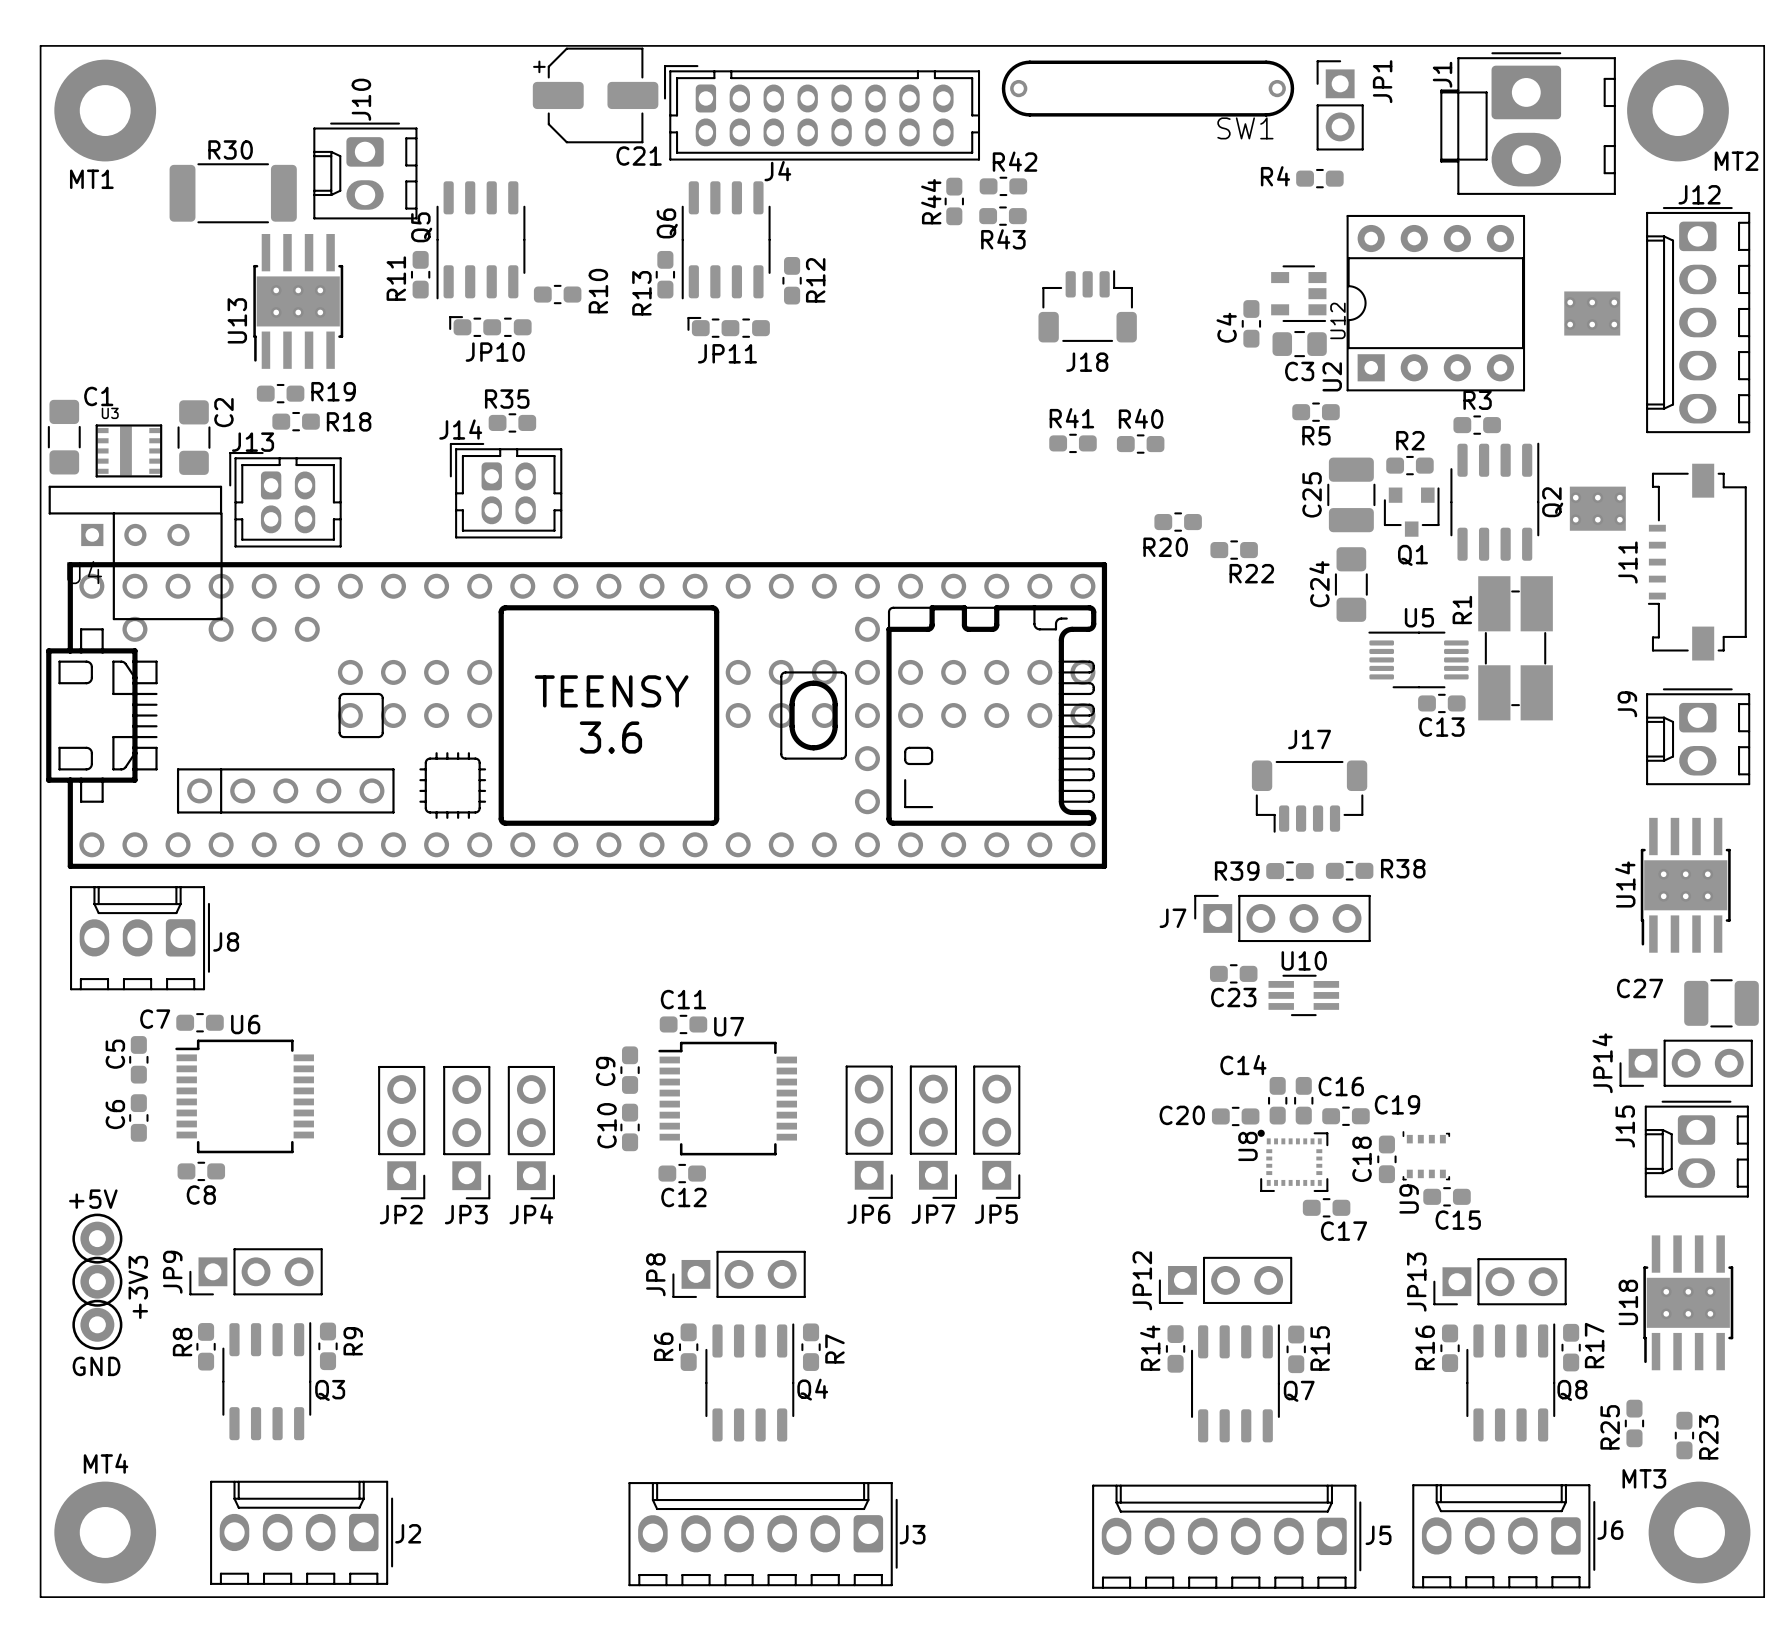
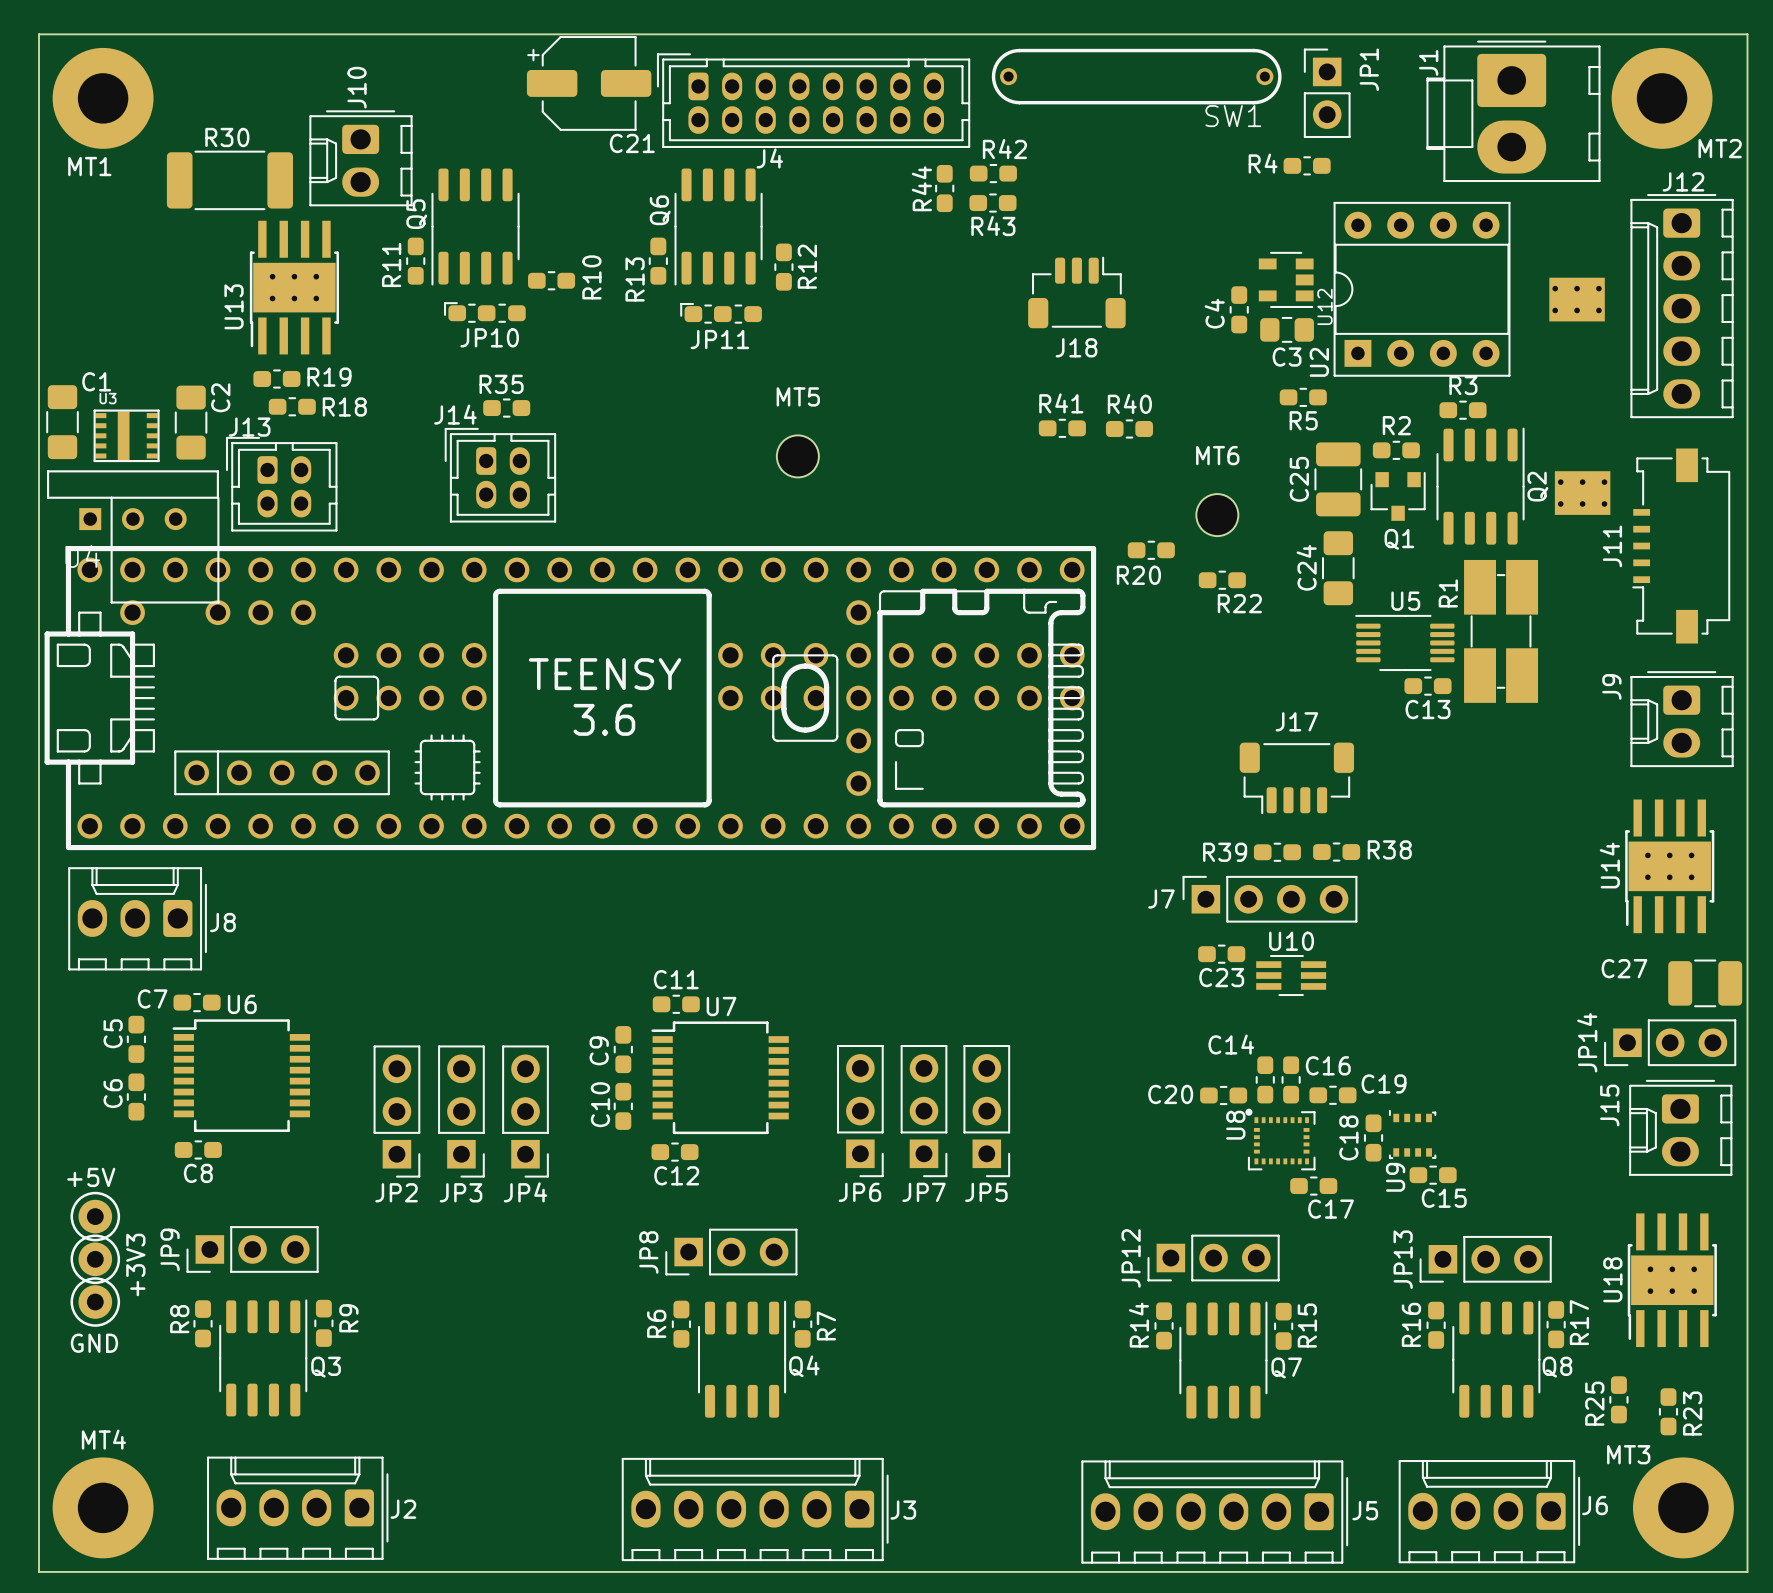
MT5: none -> (797, 456)
R20 position: (1178, 522) -> (1151, 550)
MT6: none -> (1217, 515)
R22 position: (1234, 550) -> (1222, 580)

